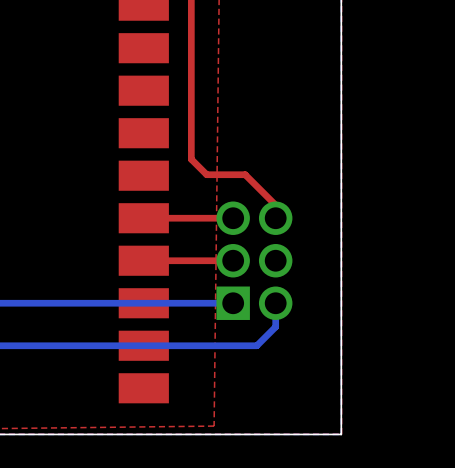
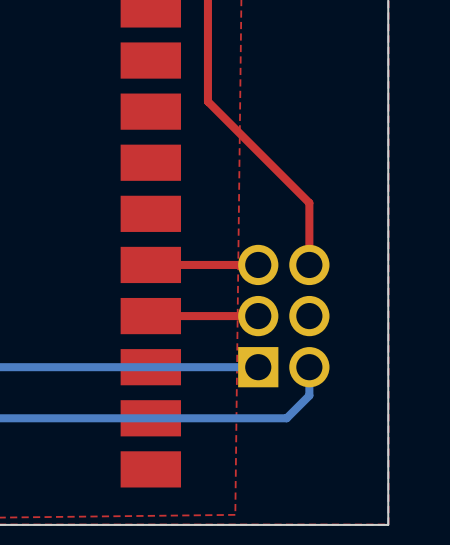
top track: (191, 82) (191, 159) (206, 174) (245, 174) (275, 205) -> (207, 101) (309, 202) (309, 249)

